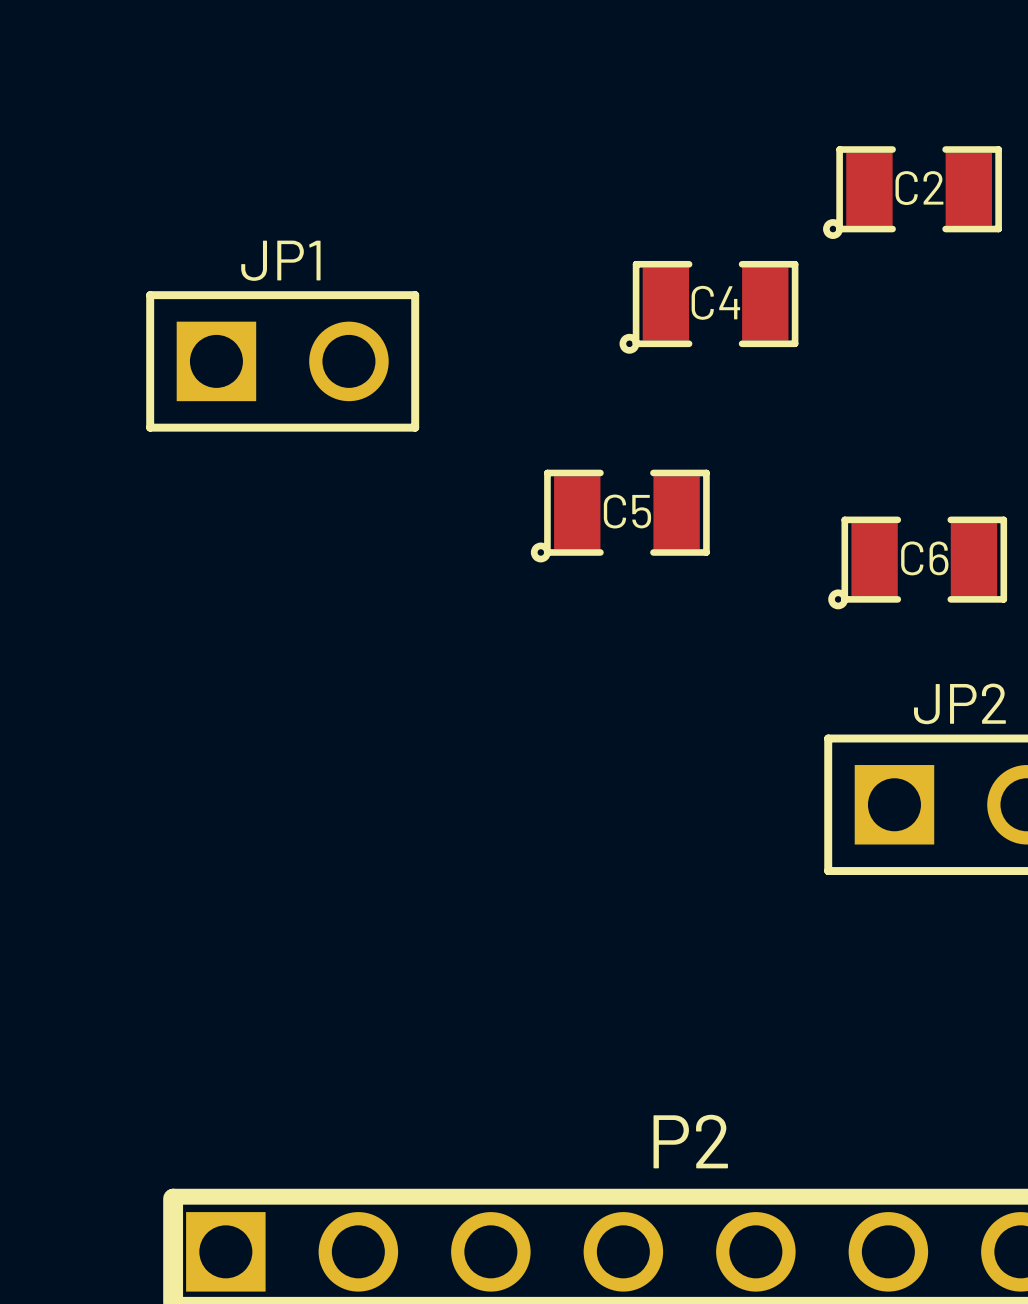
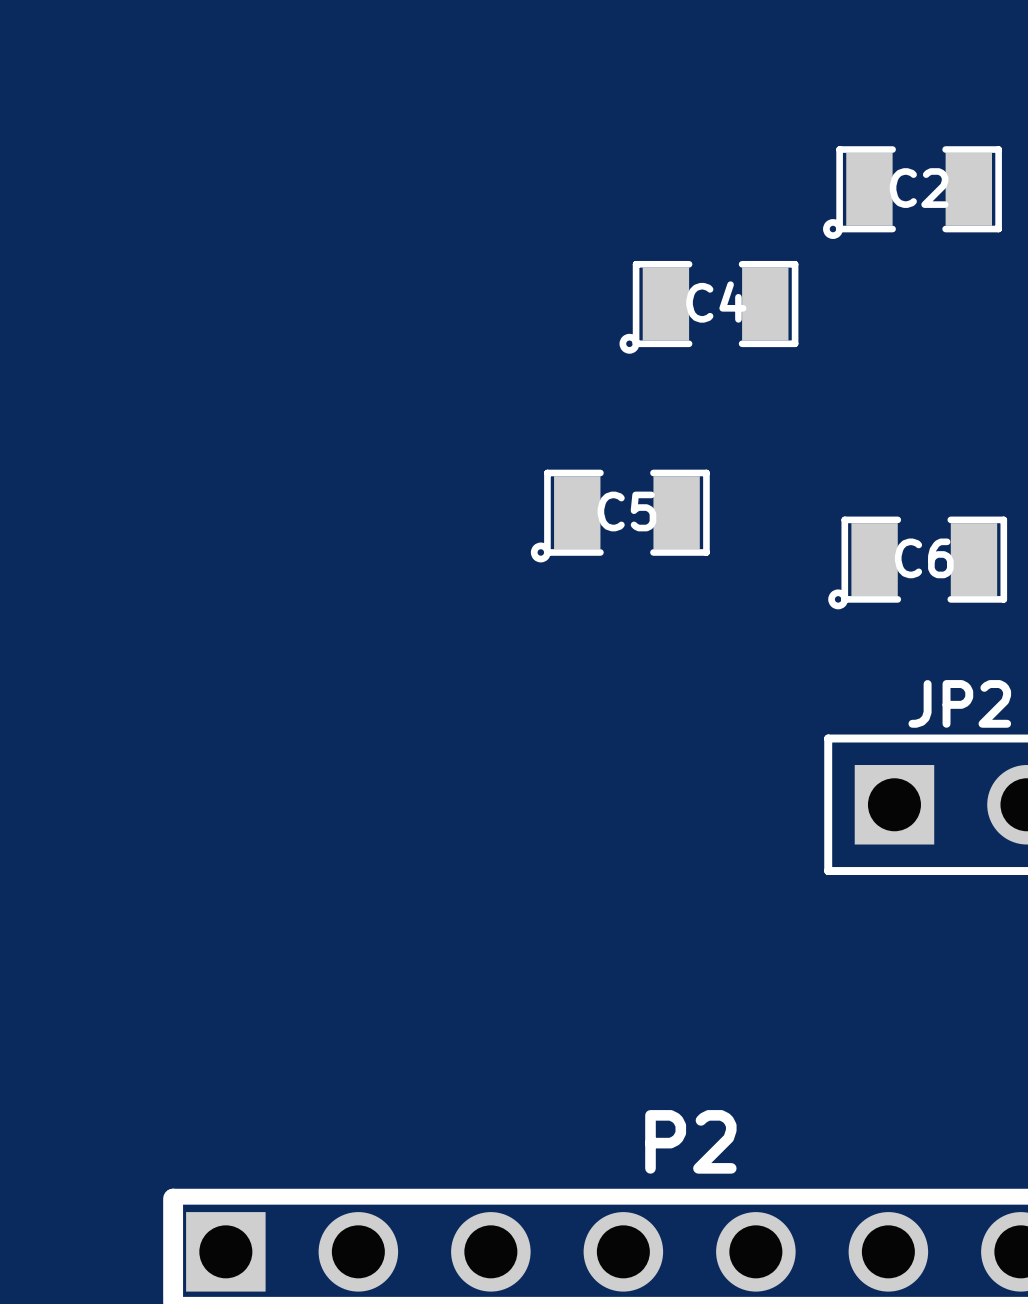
JP1: (282, 361) -> none

